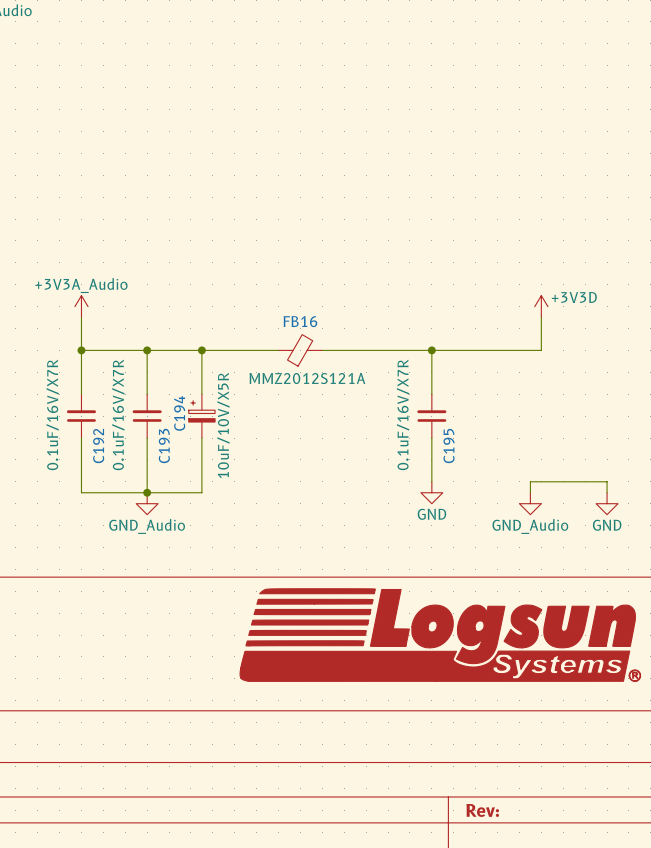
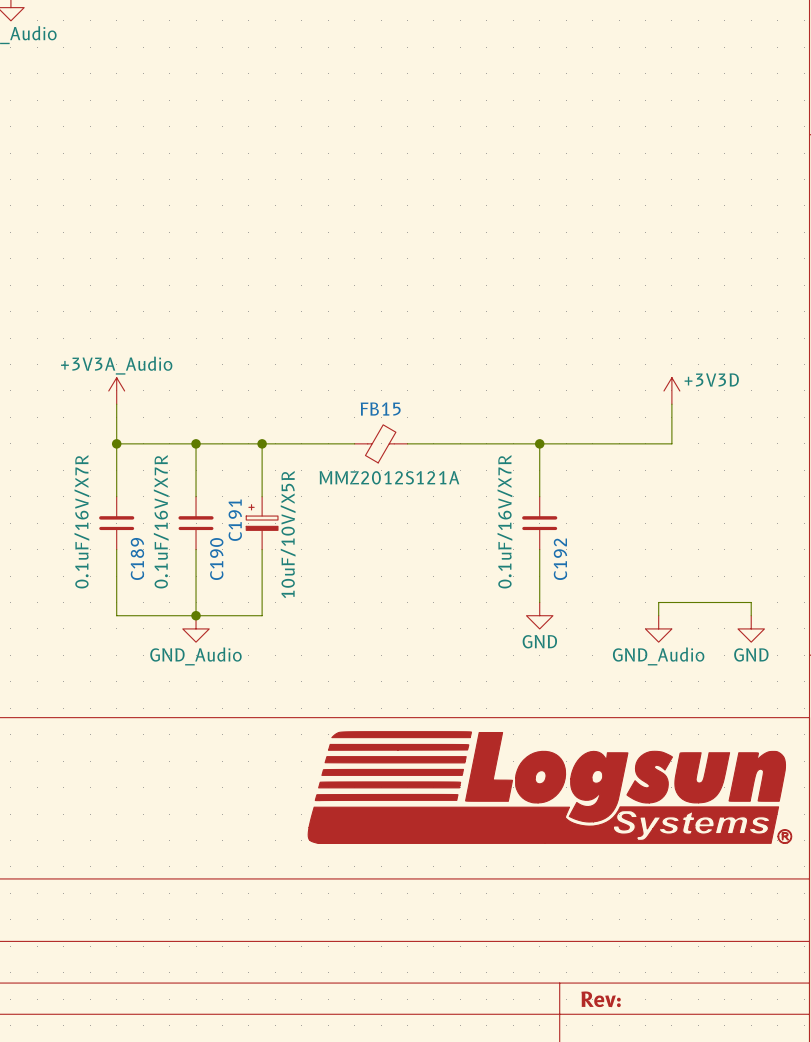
FB16 name: FB16 (300, 321) -> FB15 (380, 409)
C194 name: C194 (179, 413) -> C191 (235, 520)
C192 name: C192 (98, 445) -> C189 (137, 558)
C193 name: C193 (164, 445) -> C190 (216, 559)
C195 name: C195 (449, 446) -> C192 (560, 559)

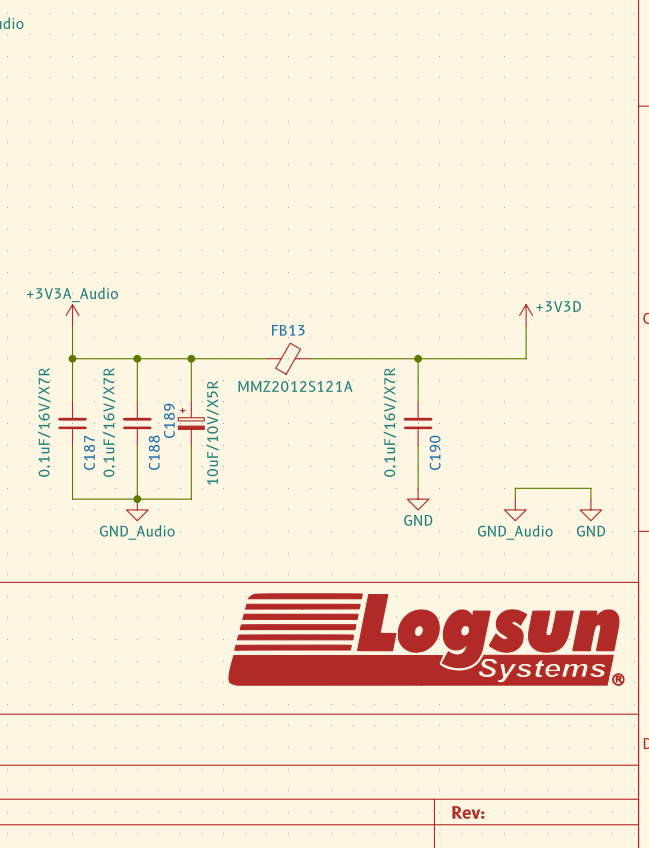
FB15 name: FB15 (380, 409) -> FB13 (288, 330)
C191 name: C191 (235, 520) -> C189 (169, 420)
C189 name: C189 (137, 558) -> C187 (89, 452)
C190 name: C190 (216, 559) -> C188 (154, 452)
C192 name: C192 (560, 559) -> C190 (435, 452)

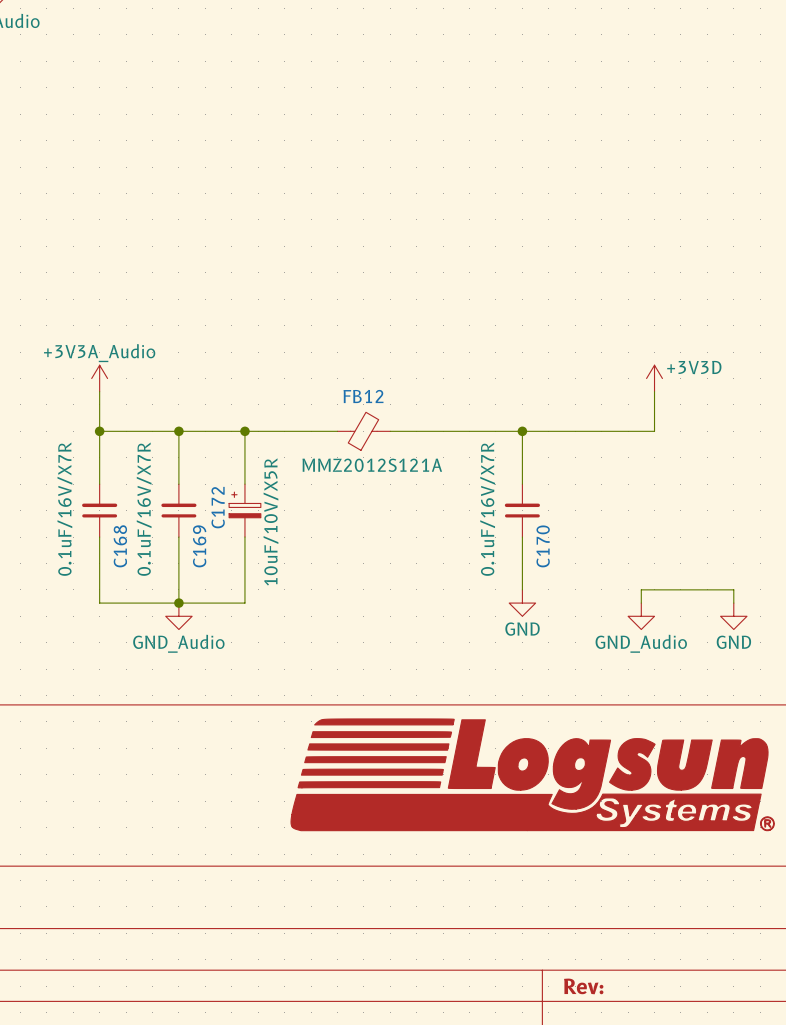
FB13 name: FB13 (288, 330) -> FB12 (363, 396)
C189 name: C189 (169, 420) -> C172 (218, 507)
C187 name: C187 (89, 452) -> C168 (120, 546)
C188 name: C188 (154, 452) -> C169 (199, 546)
C190 name: C190 (435, 452) -> C170 (543, 546)

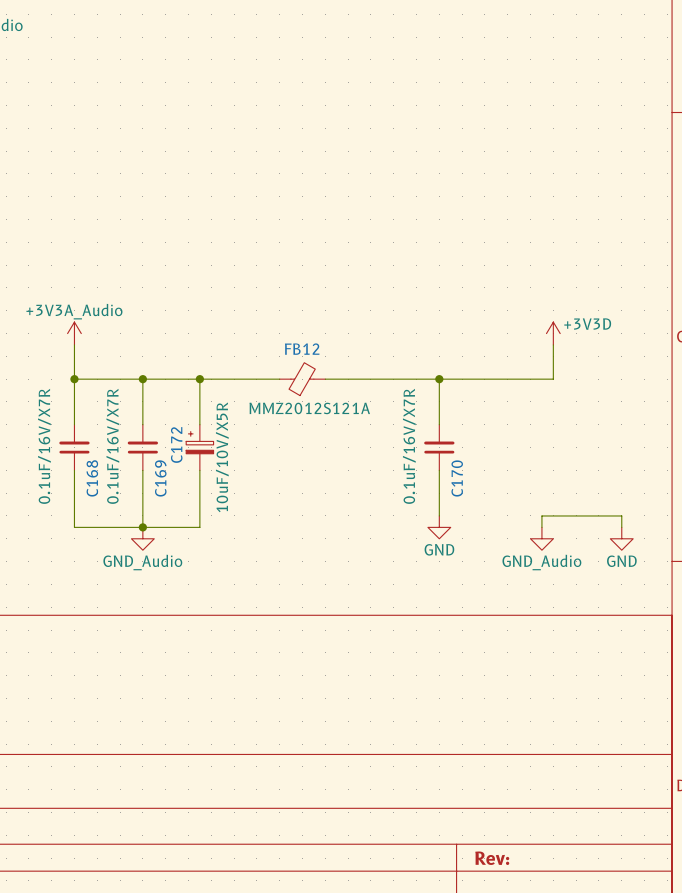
power symbol: (532, 774) -> none

